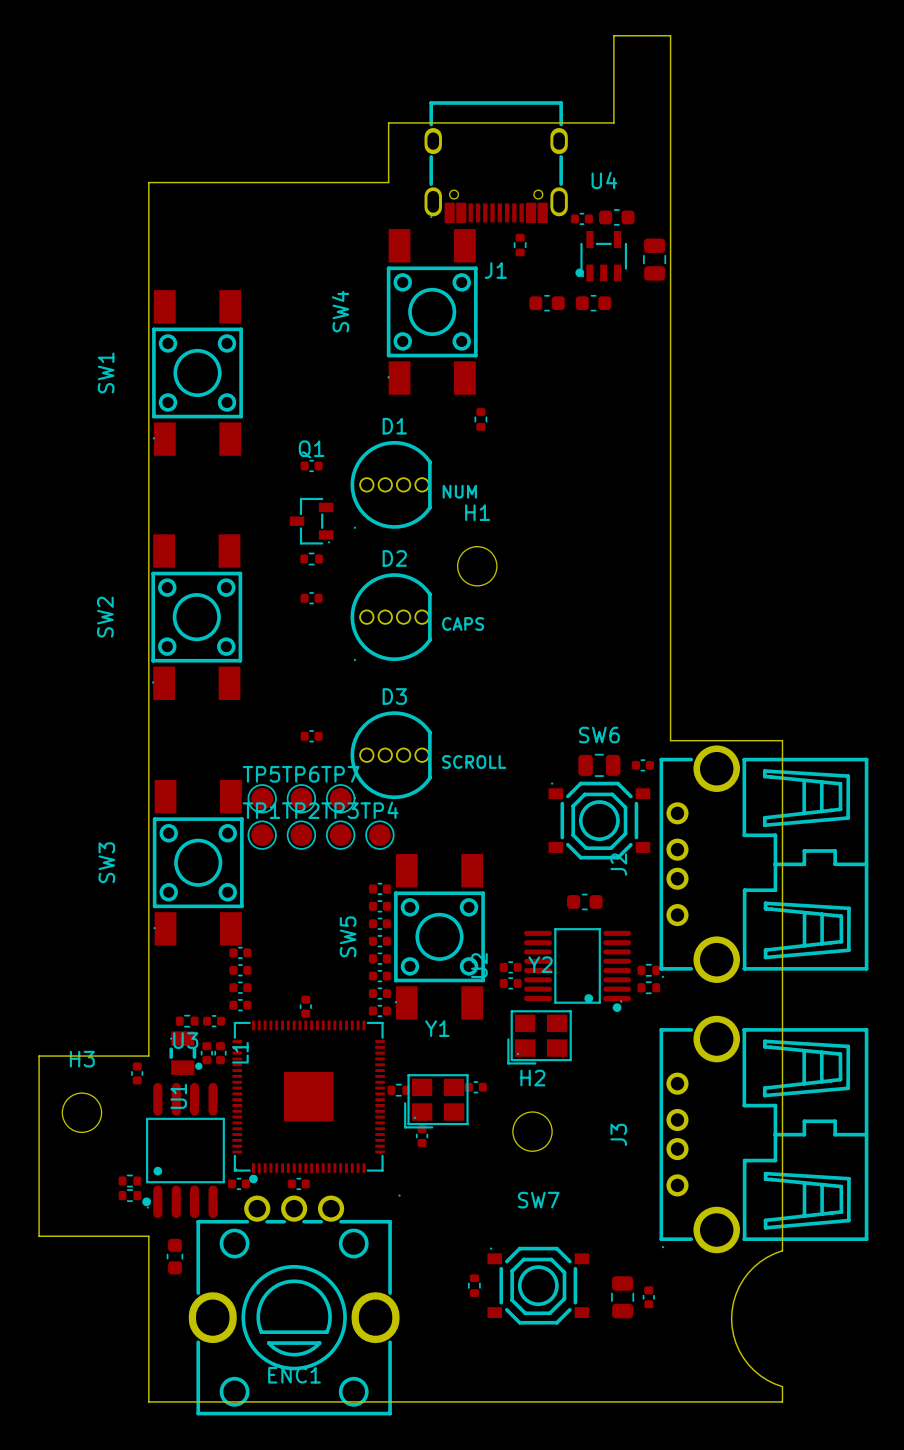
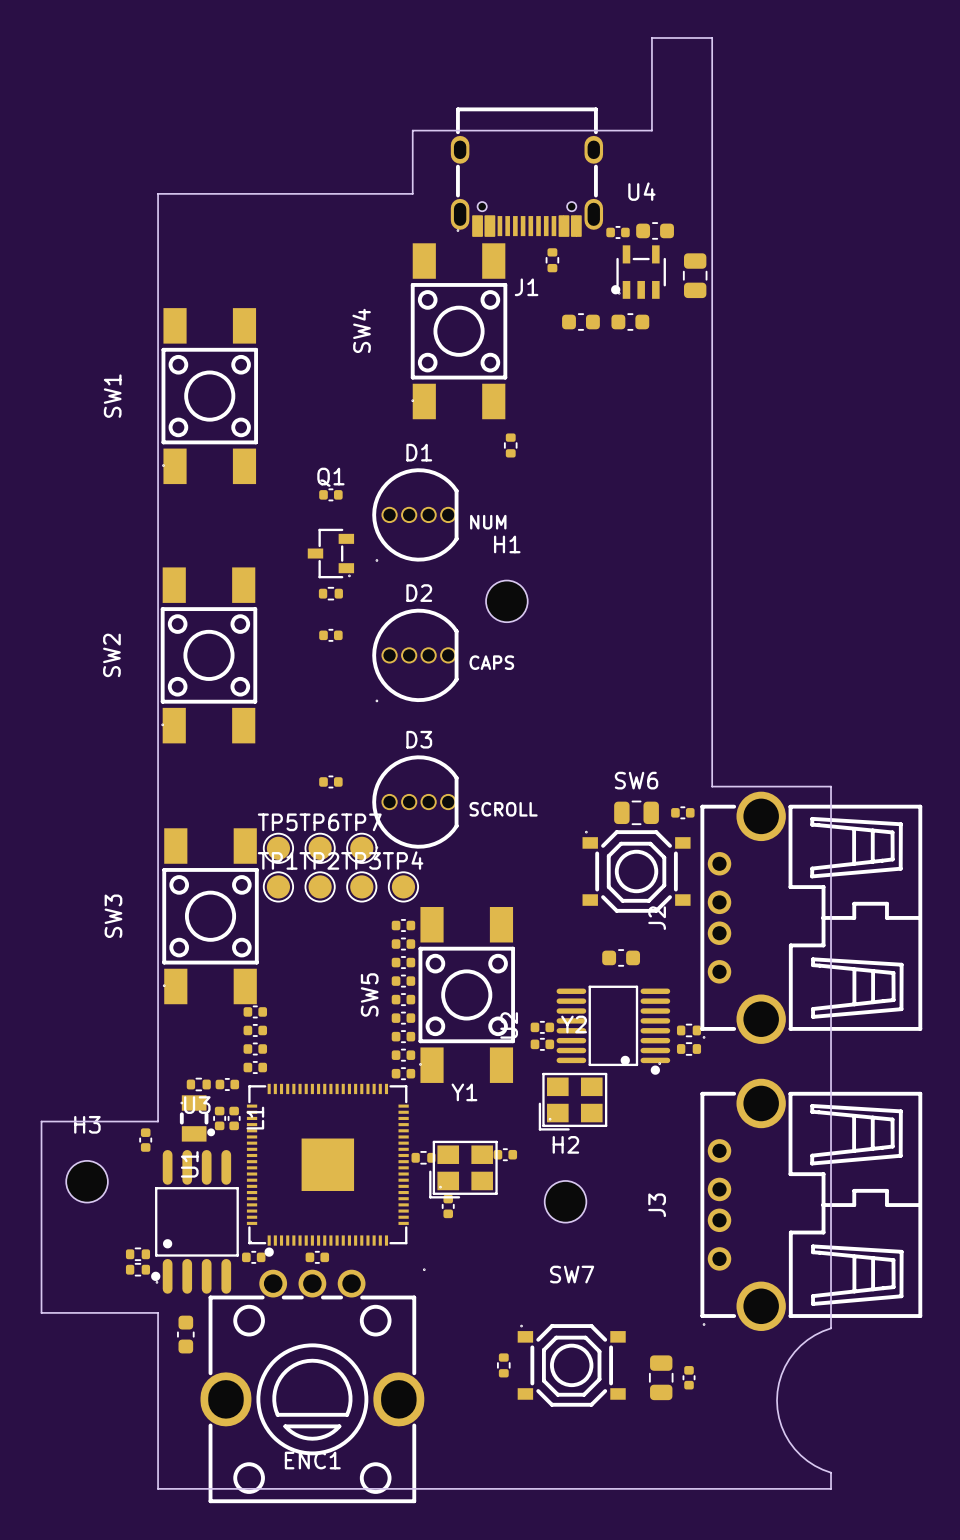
part rotation: 0° (305, 1006) -> 90° clockwise (403, 925)
part position: (305, 1006) -> (403, 925)

